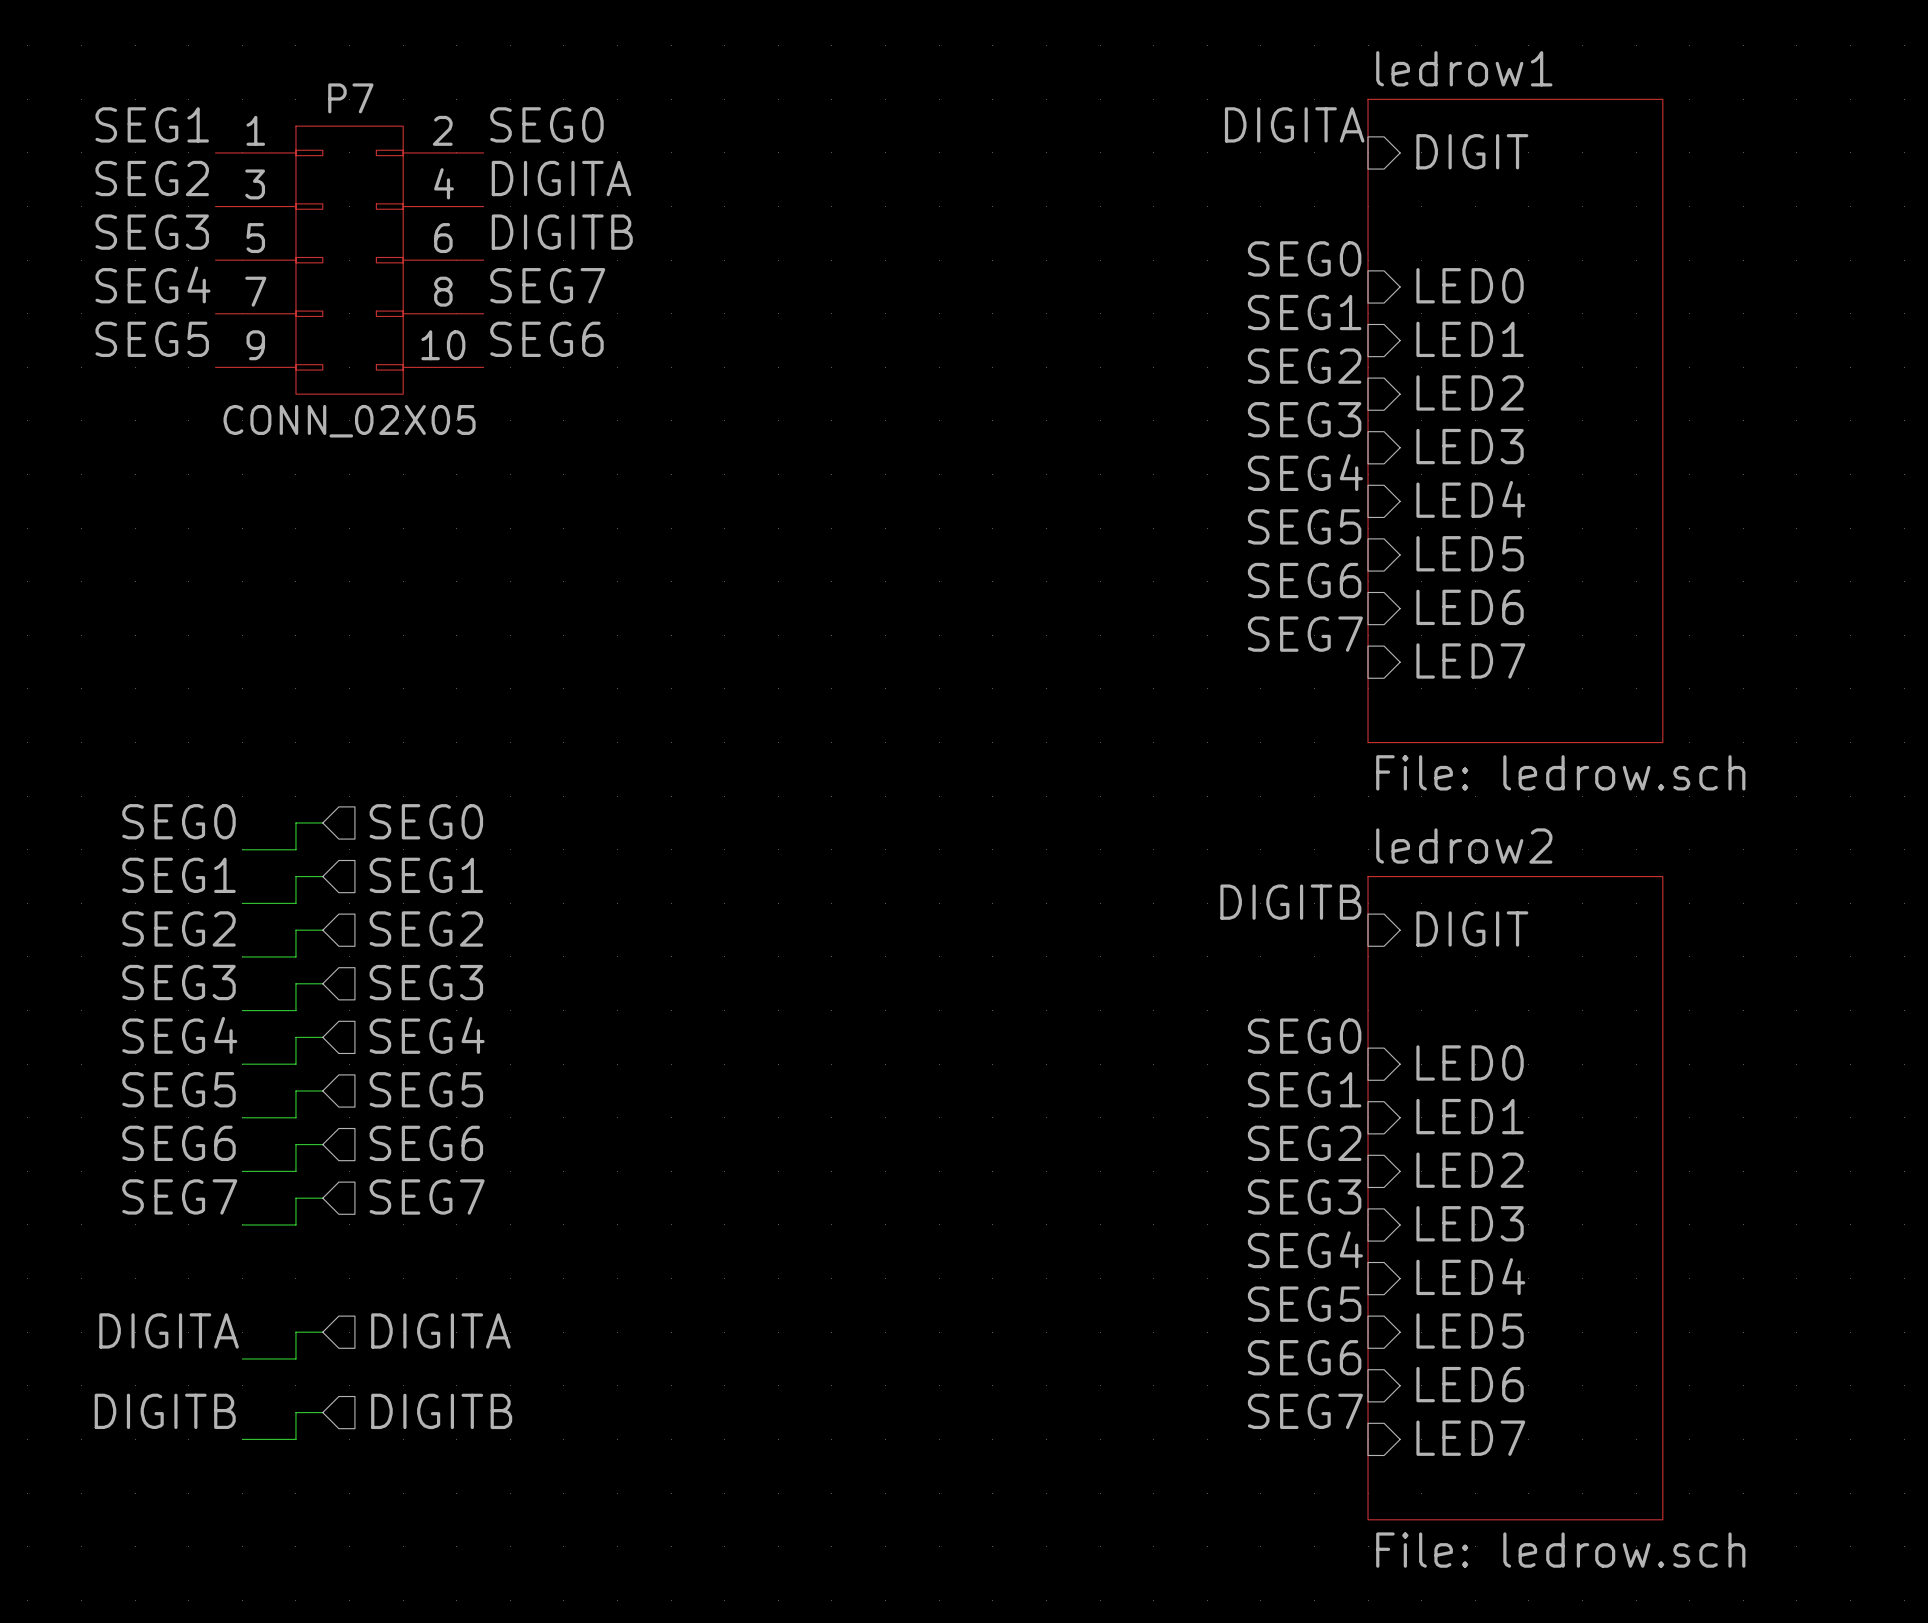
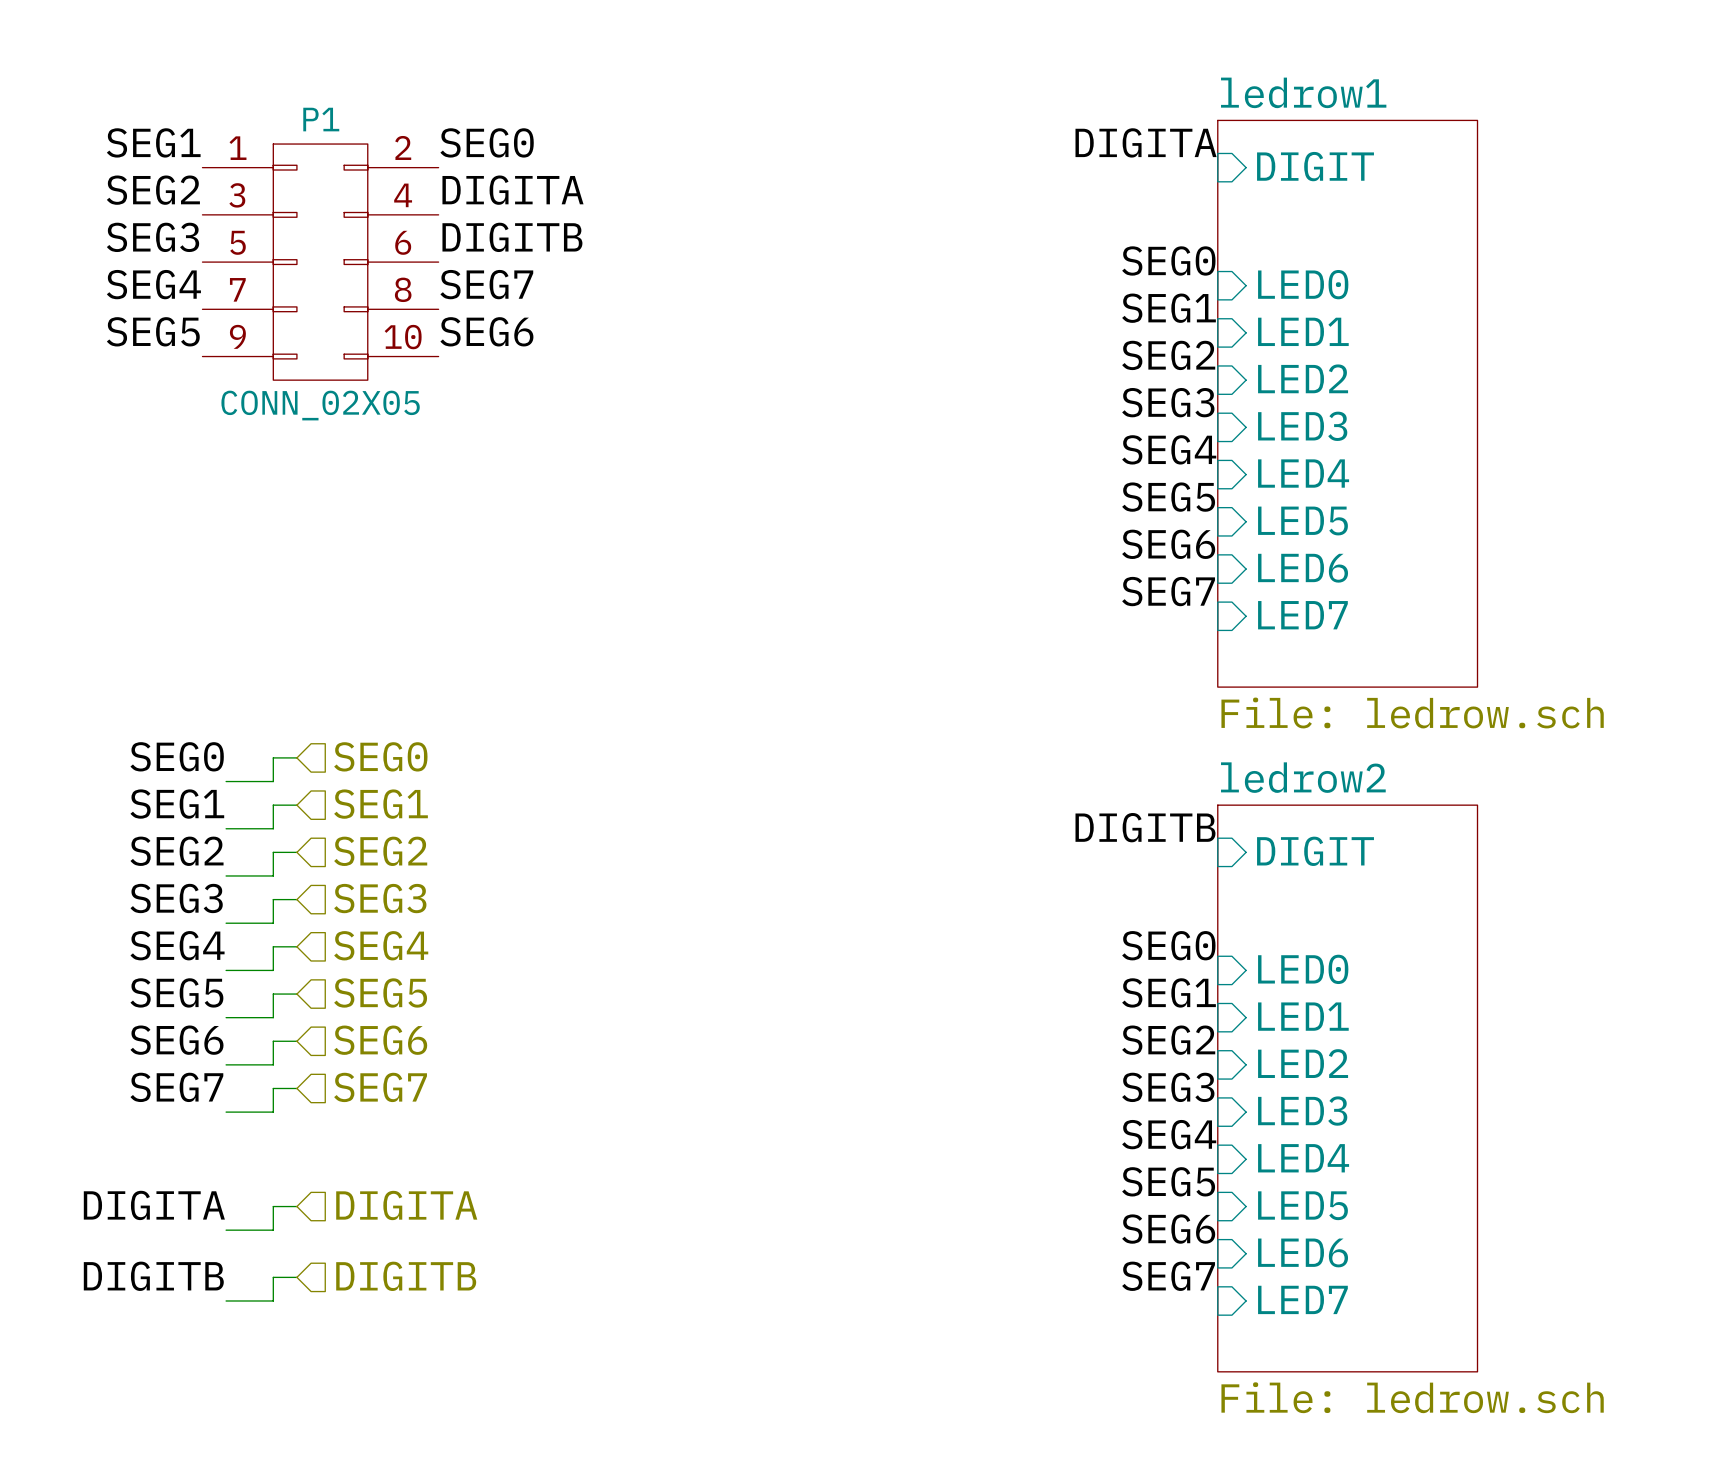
P7 name: P7 (350, 98) -> P1 (321, 119)

